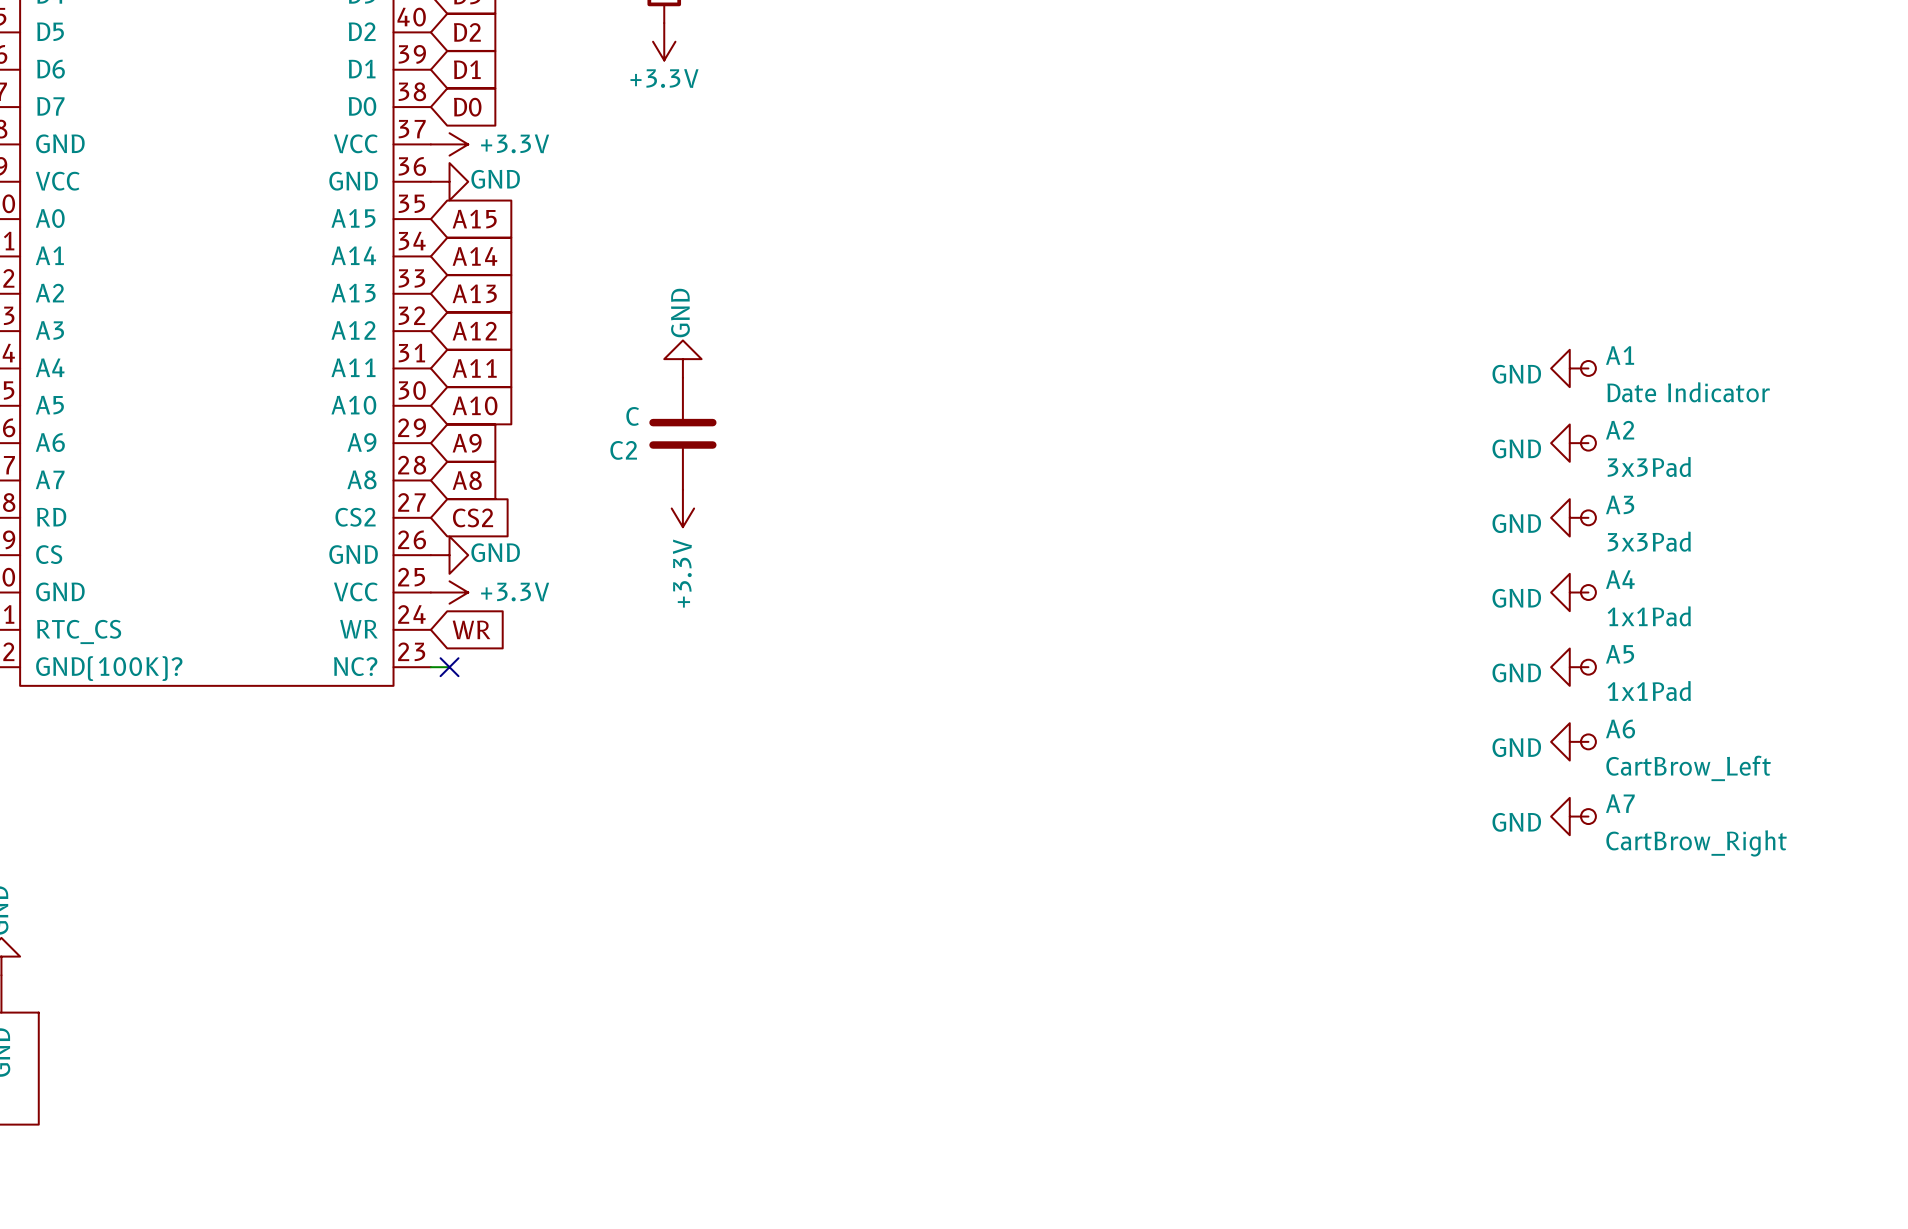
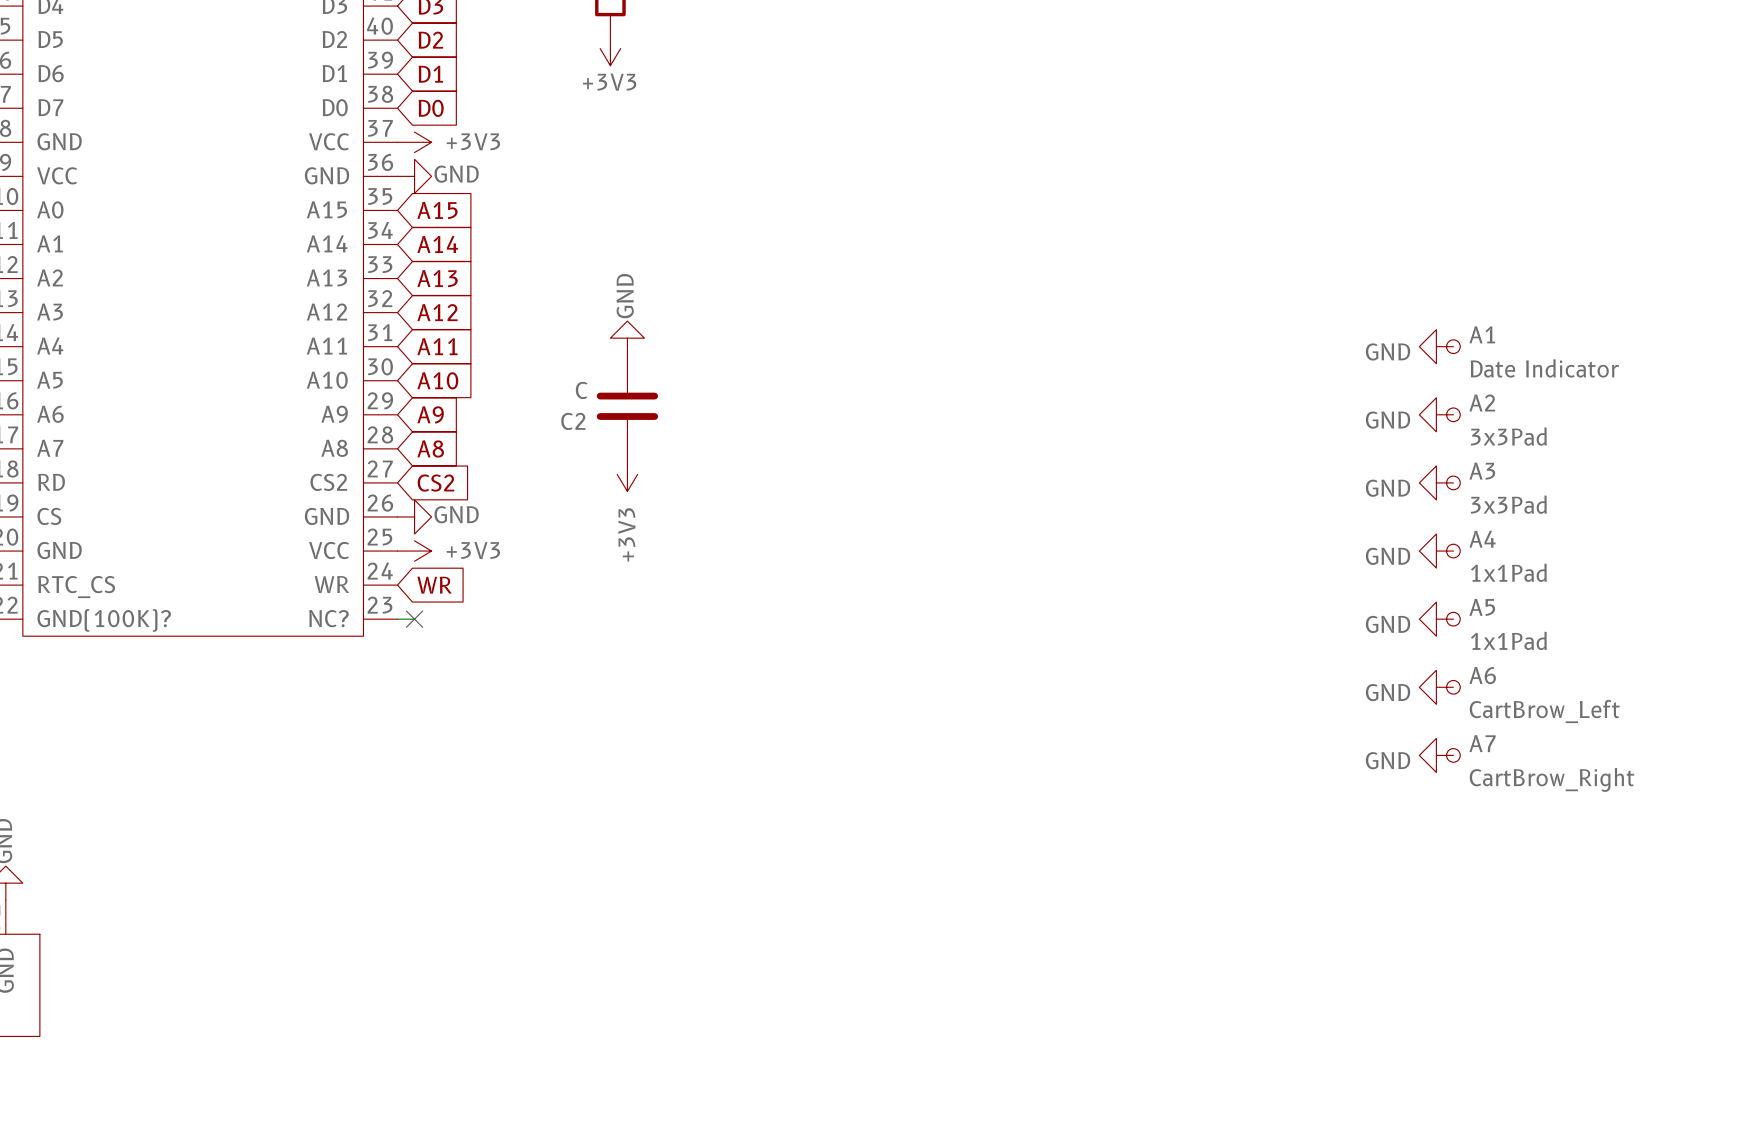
power symbol: +3.3V (664, 41) -> +3V3 (610, 48)
power symbol: +3.3V (449, 144) -> +3V3 (414, 142)
power symbol: +3.3V (682, 508) -> +3V3 (627, 474)
power symbol: +3.3V (449, 592) -> +3V3 (414, 551)

